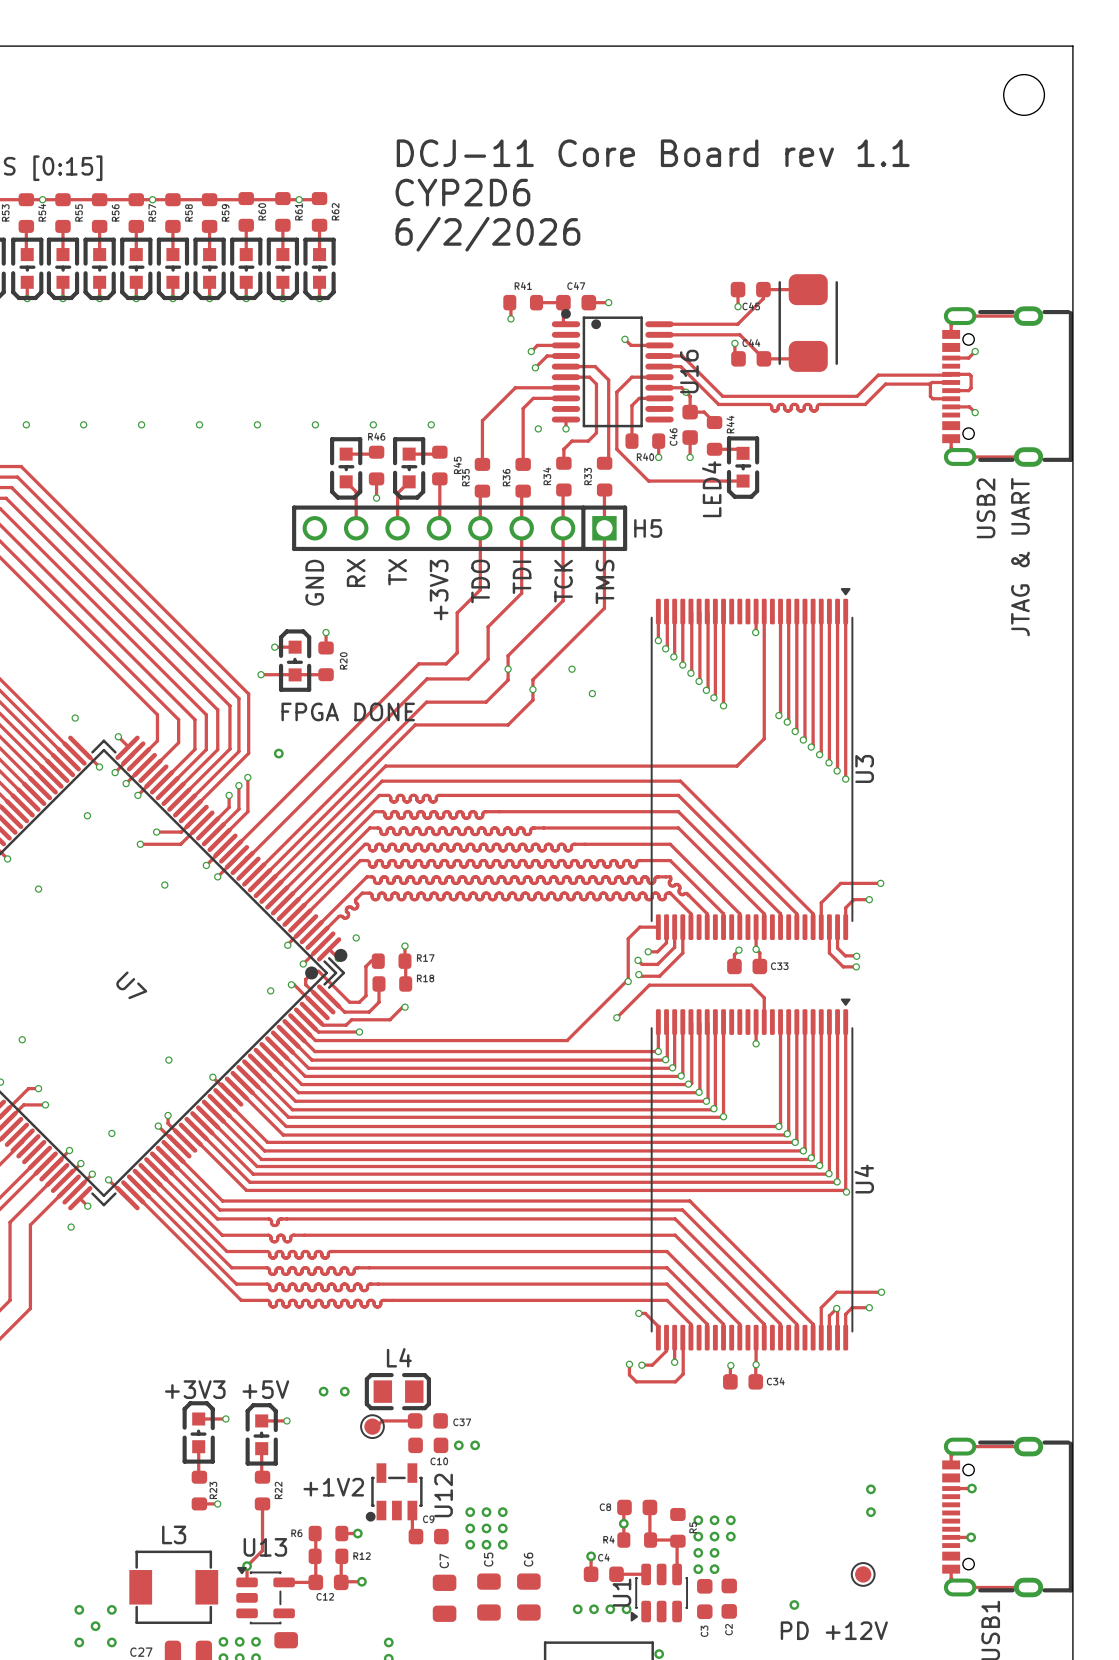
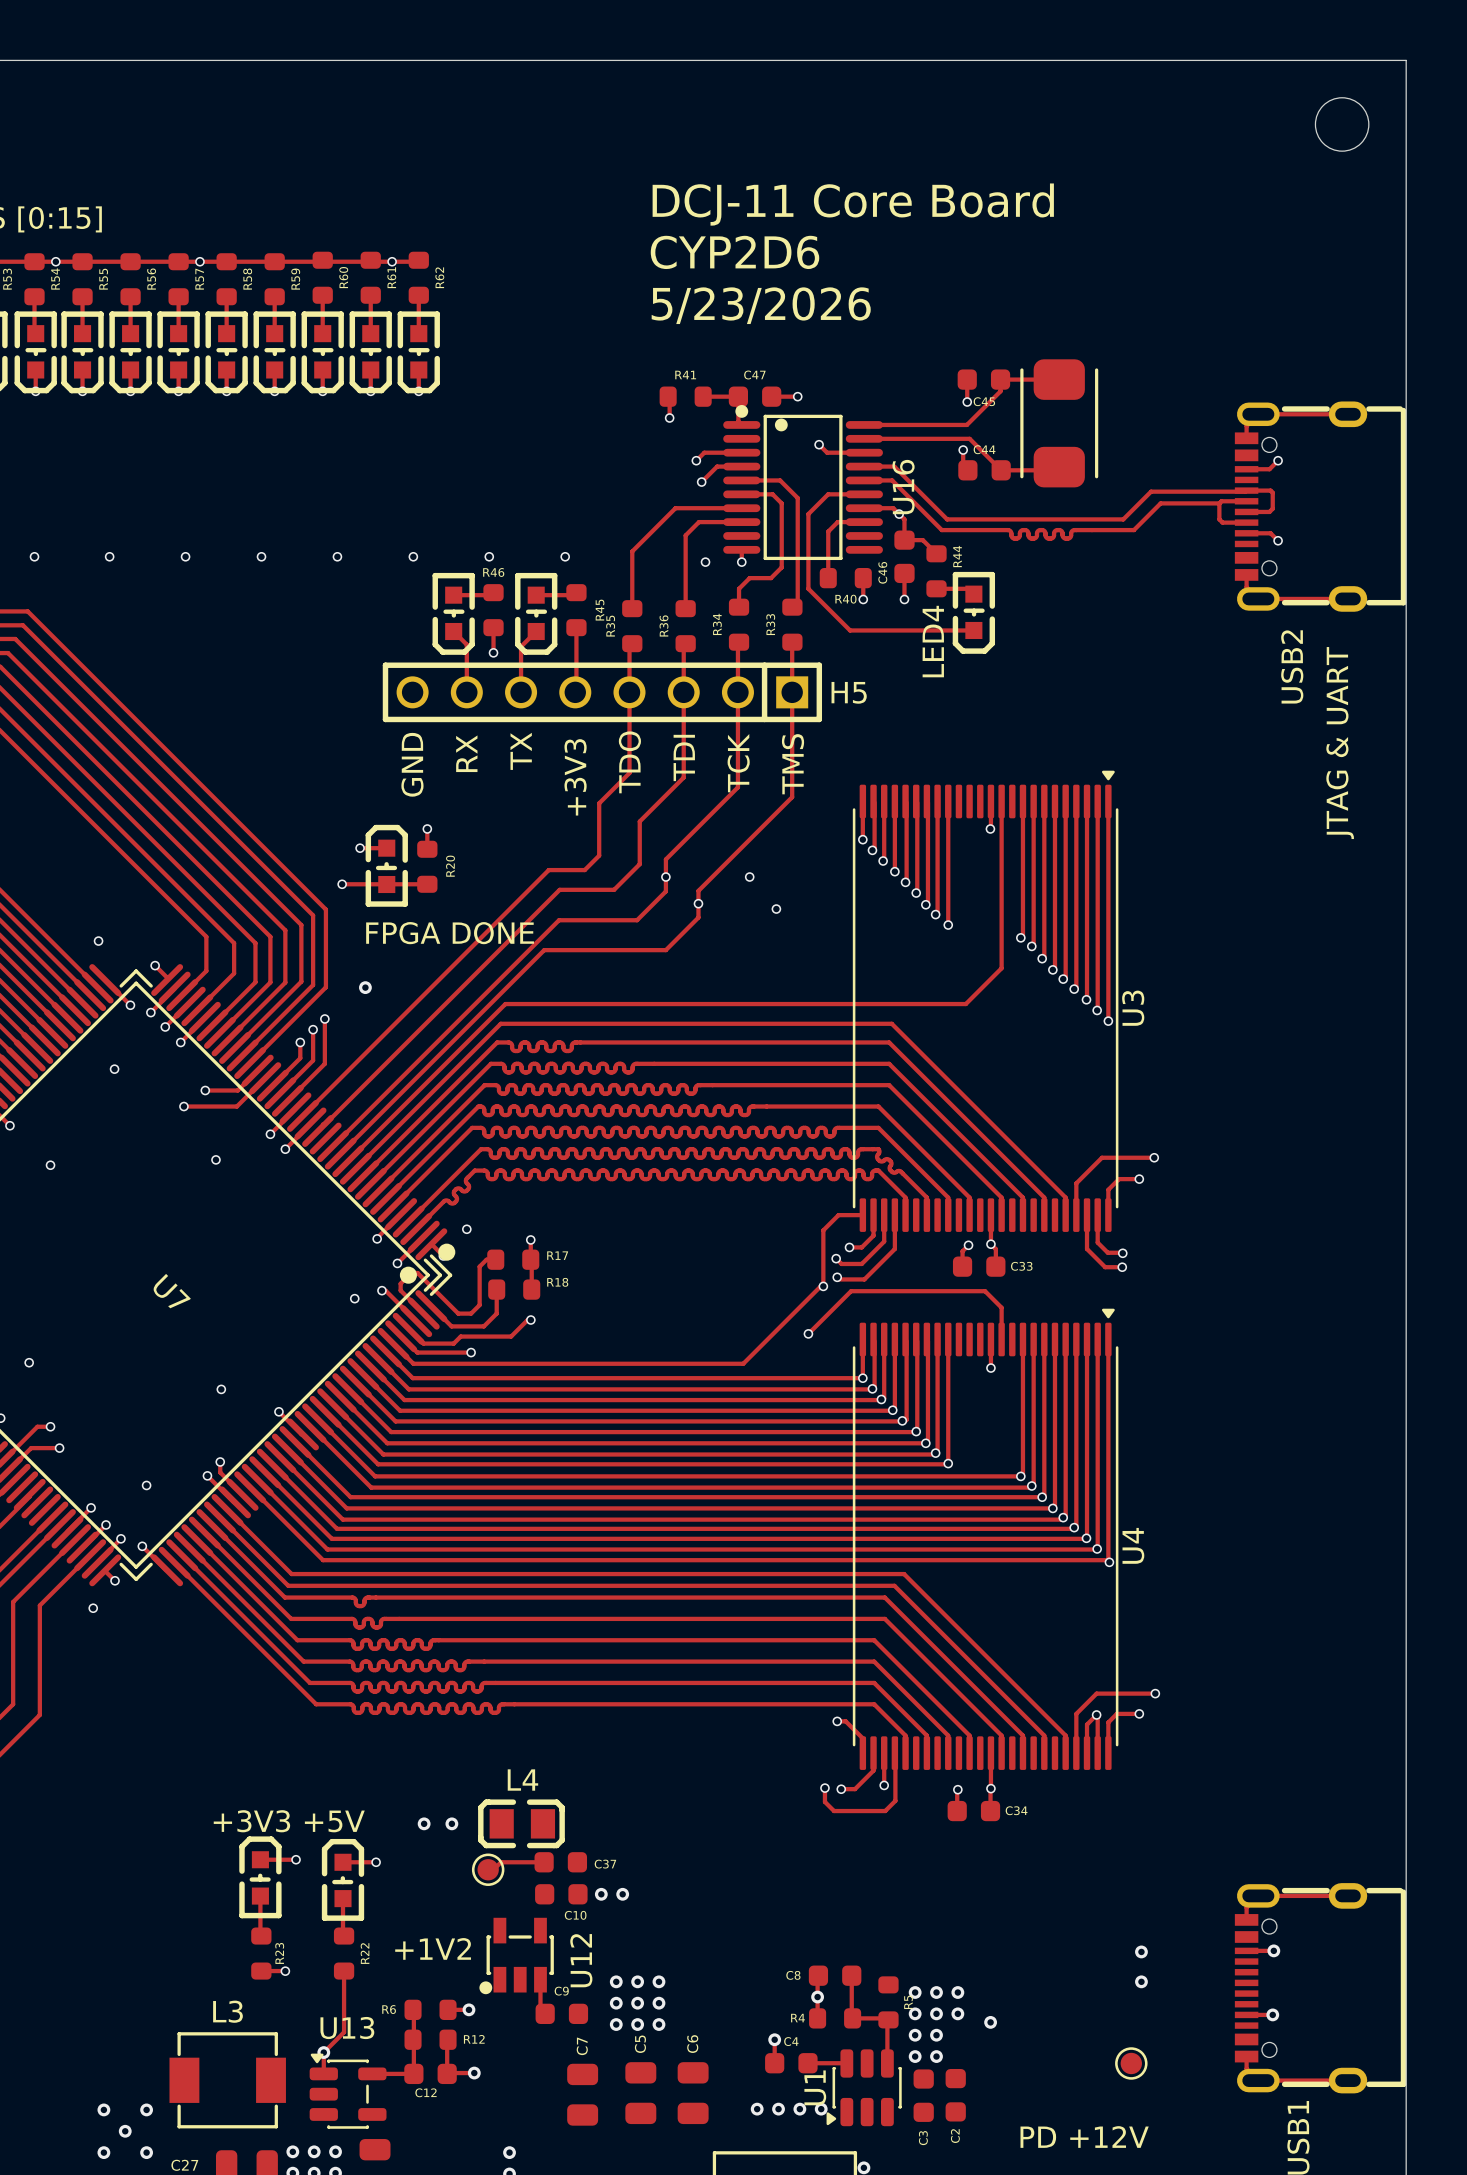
text: DCJ-11 Core Board rev 1.1 (653, 153) -> DCJ-11 Core Board (853, 204)
text position: CYP2D6 (462, 192) -> CYP2D6 (734, 252)
text: 6/2/2026 (487, 234) -> 5/23/2026 (761, 305)
via position: (794, 1605) -> (990, 2022)

